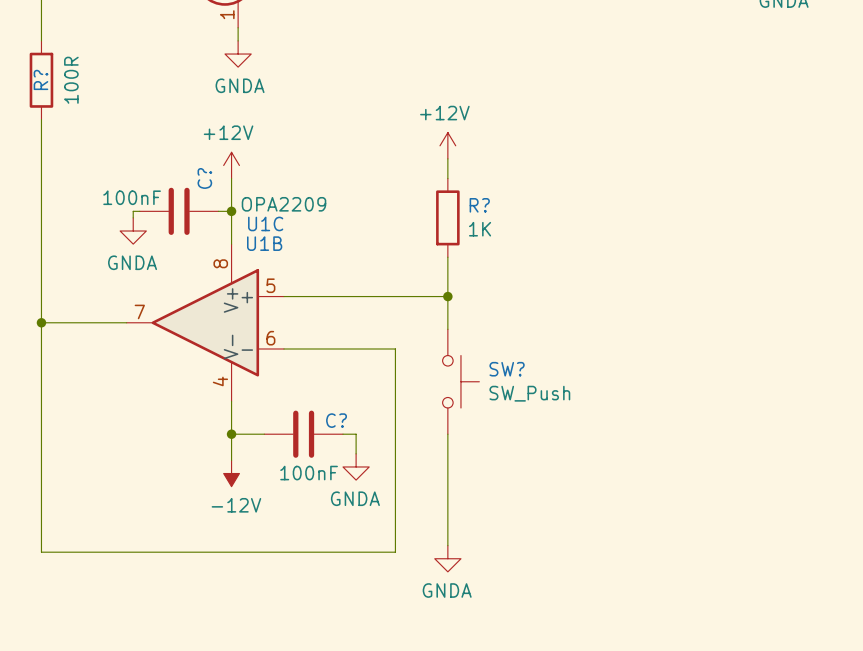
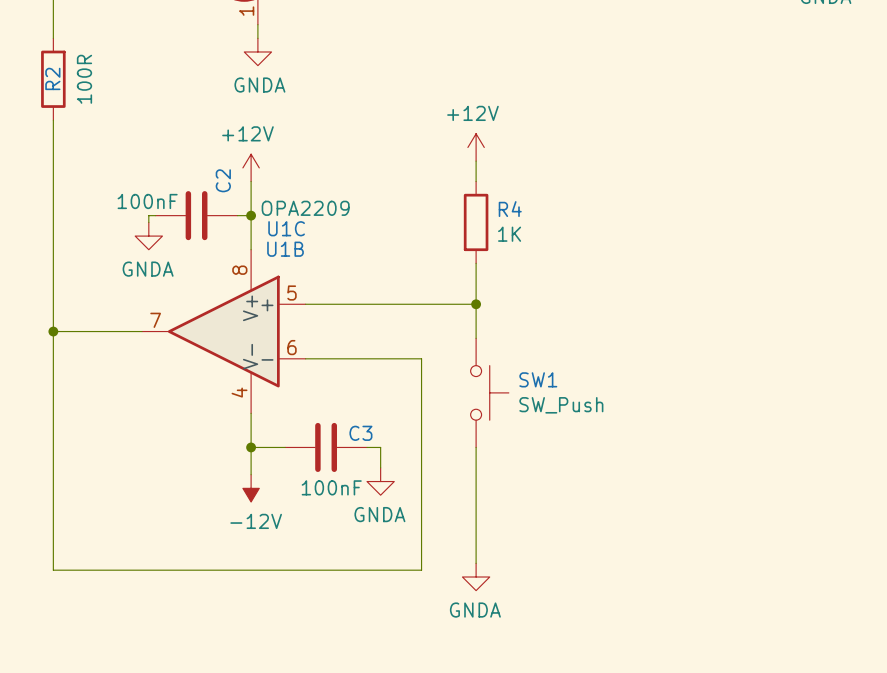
R? name: R? (40, 79) -> R2 (52, 78)
C? name: C? (204, 178) -> C2 (223, 180)
R? name: R? (479, 205) -> R4 (510, 209)
SW? name: SW? (507, 369) -> SW1 (538, 379)
C? name: C? (336, 420) -> C3 (360, 433)

